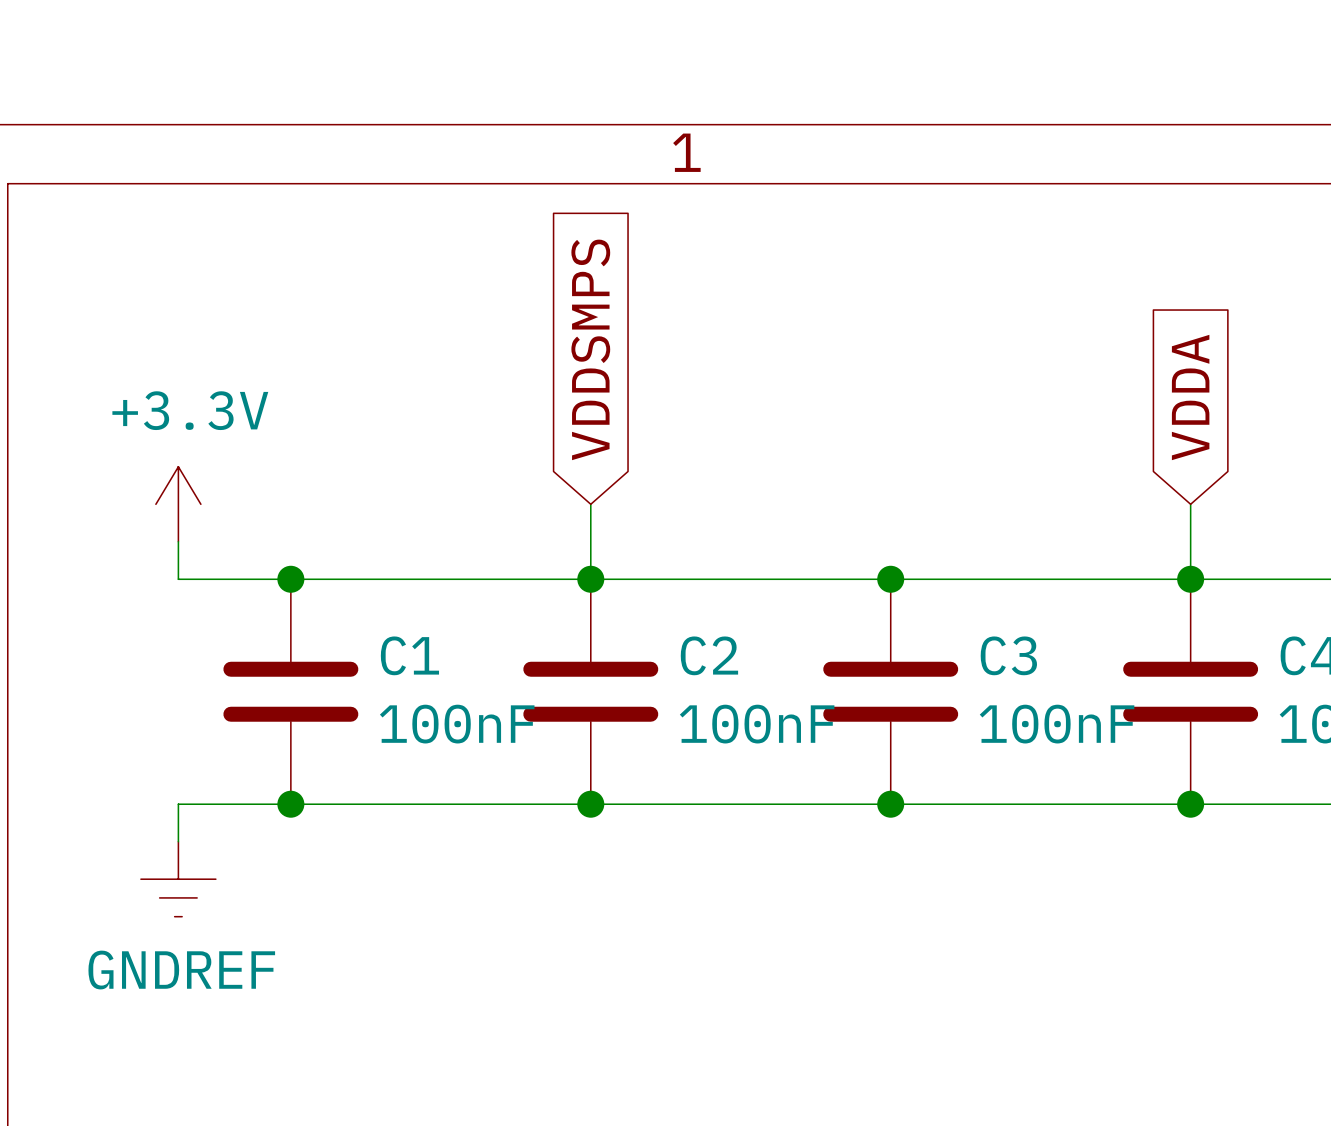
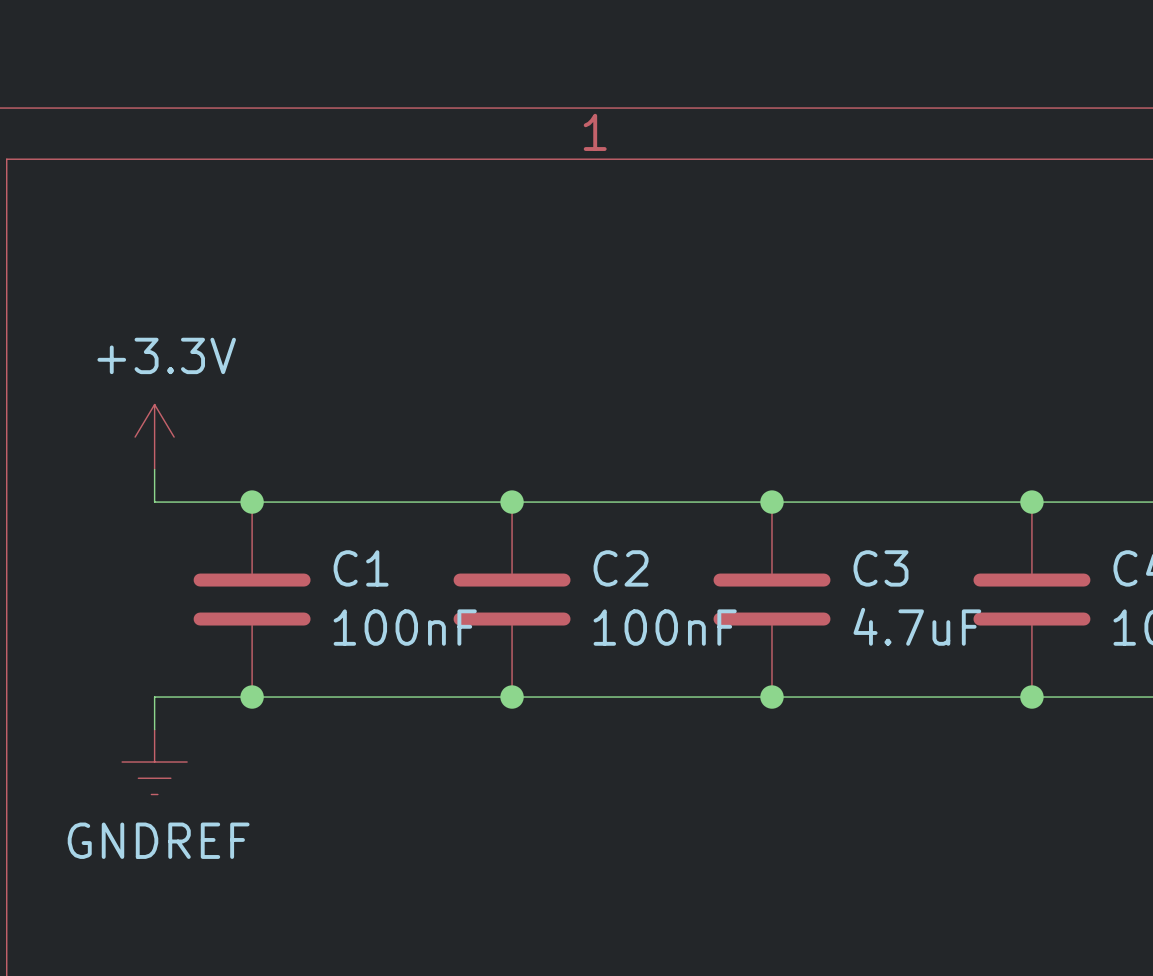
global label: VDDSMPS (590, 349) -> none
global label: VDDA (1190, 397) -> none
wire: (590, 504) (590, 579) -> none
wire: (1190, 504) (1190, 579) -> none
C3 value: 100nF (1057, 724) -> 4.7uF (917, 626)

